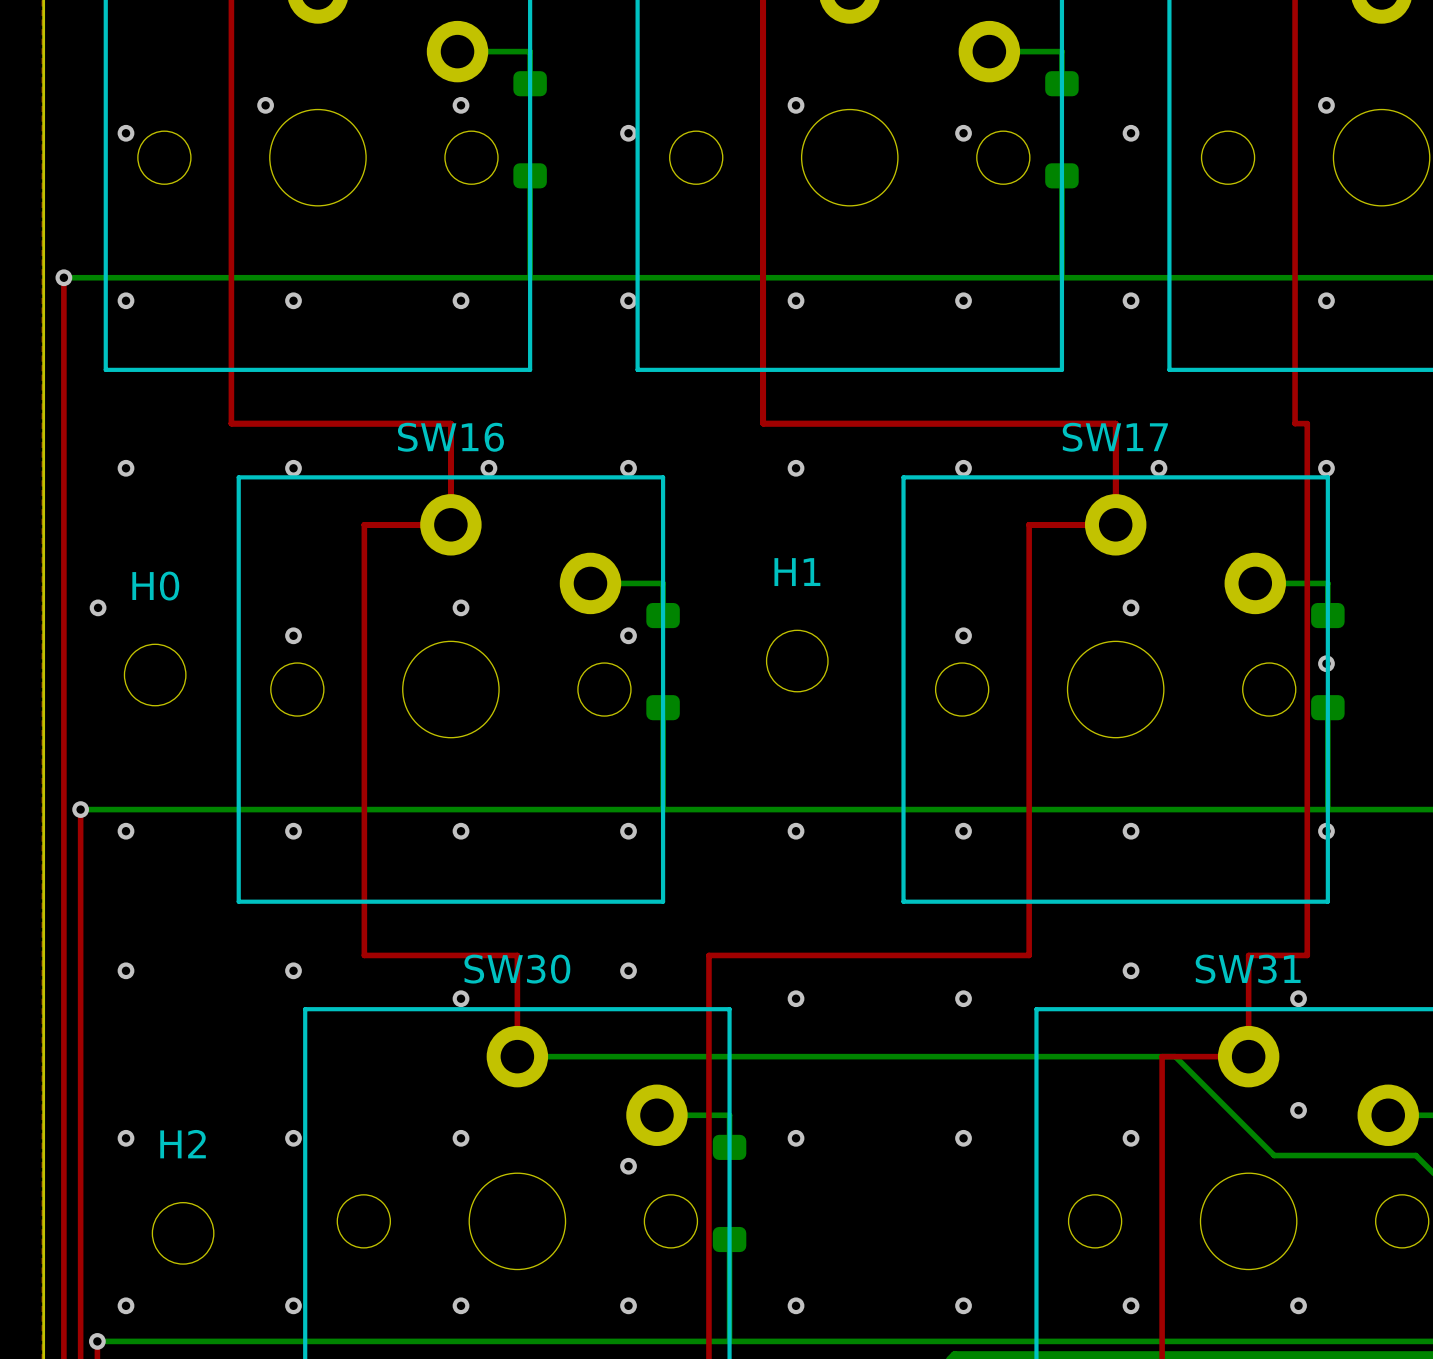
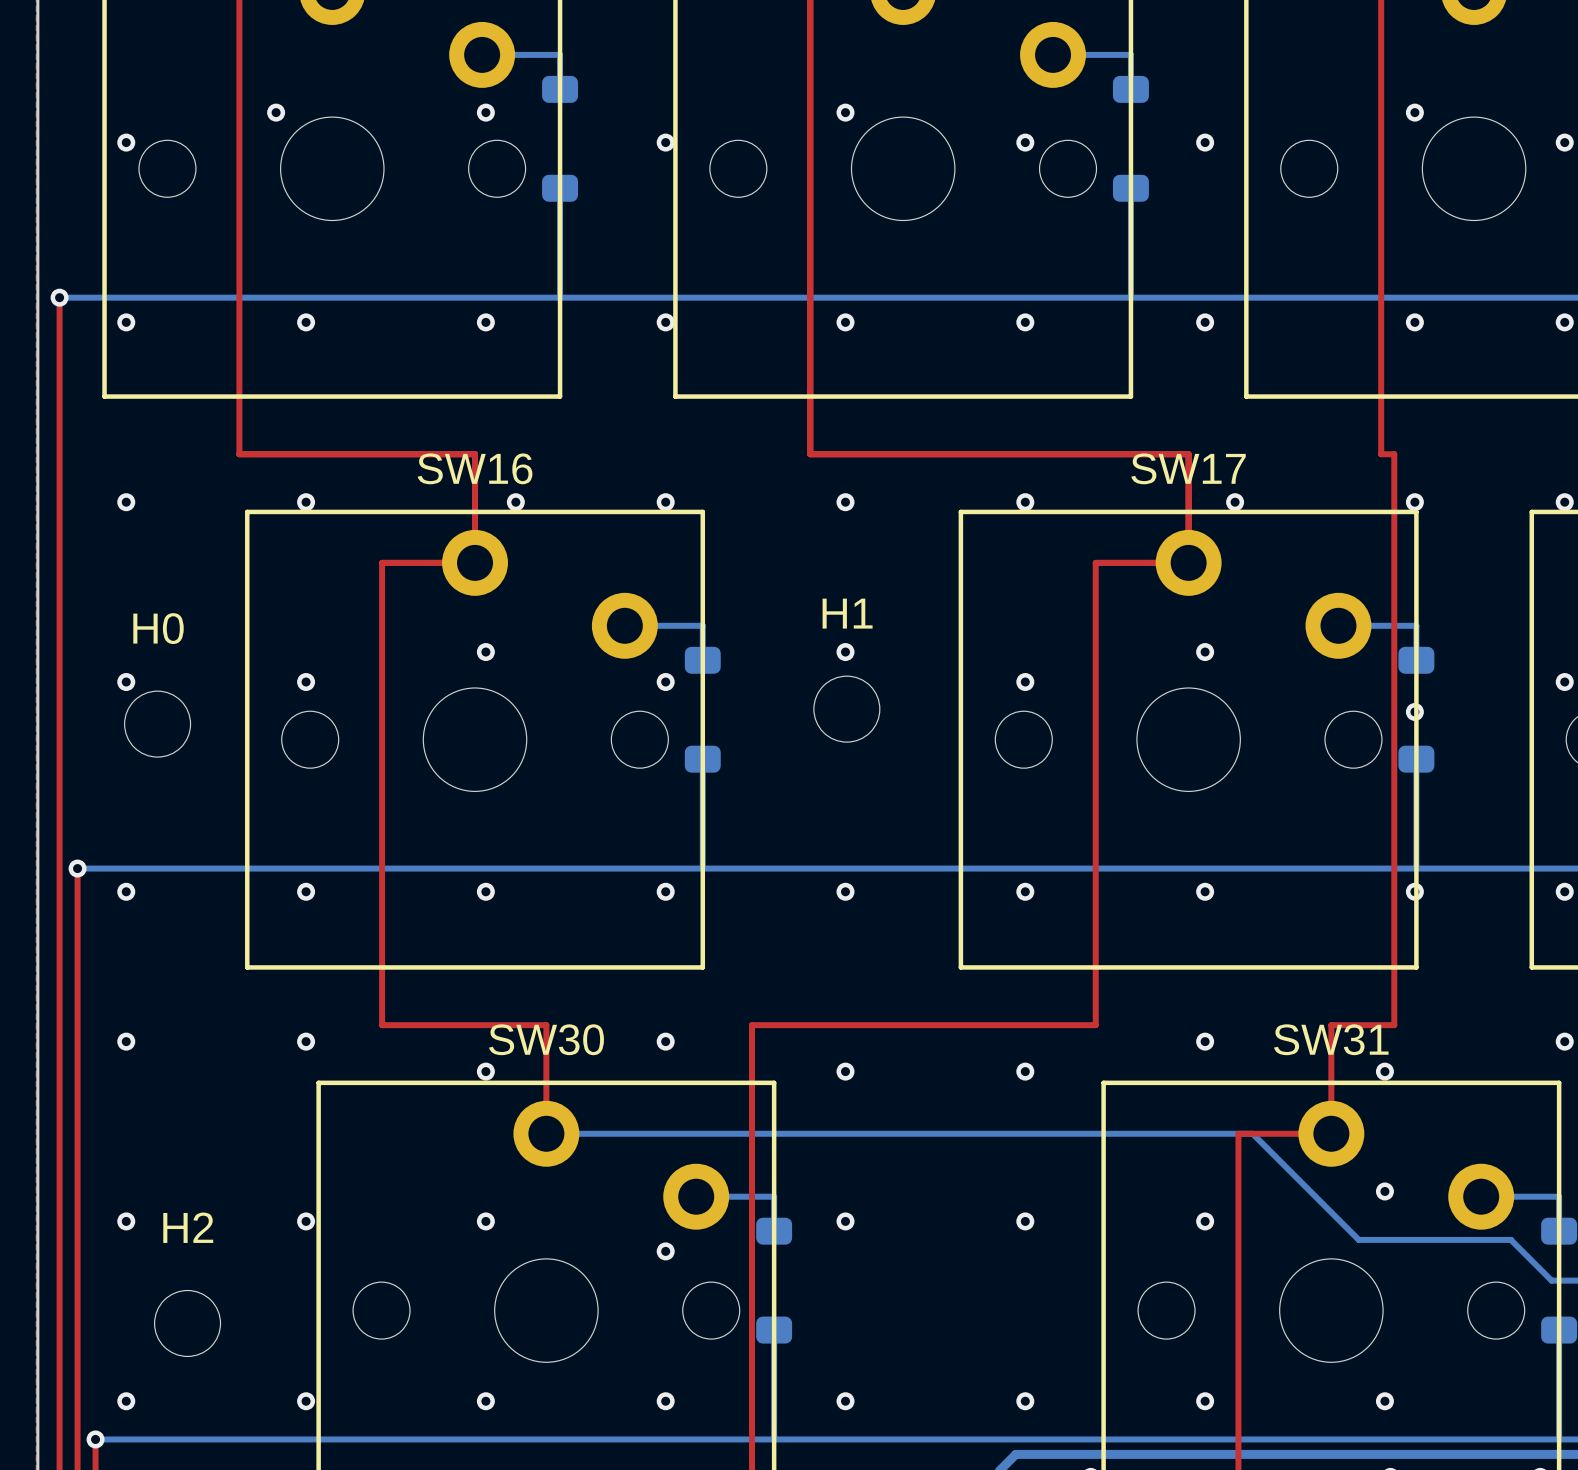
via position: (98, 607) -> (126, 682)
via: none -> (845, 652)

